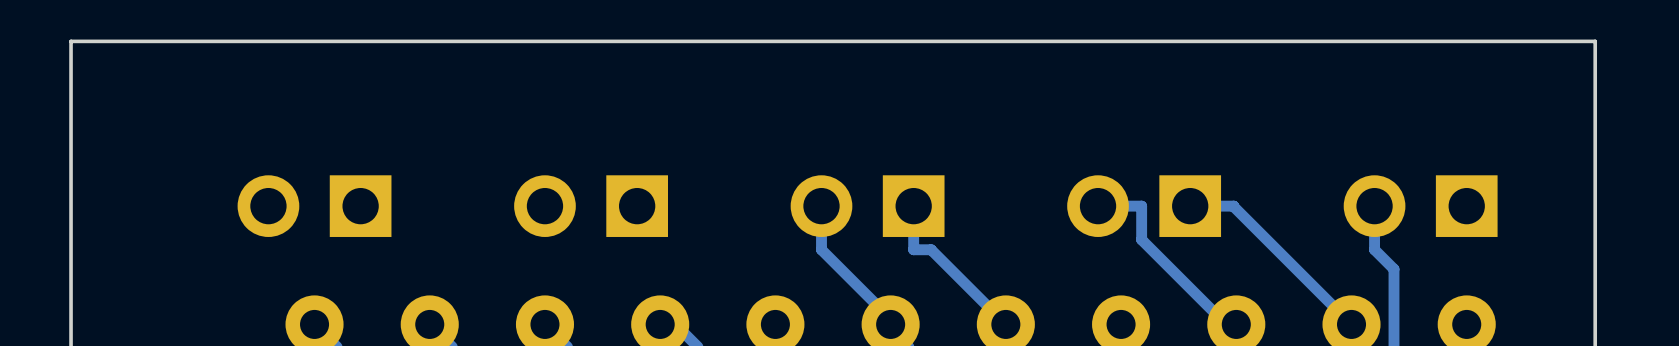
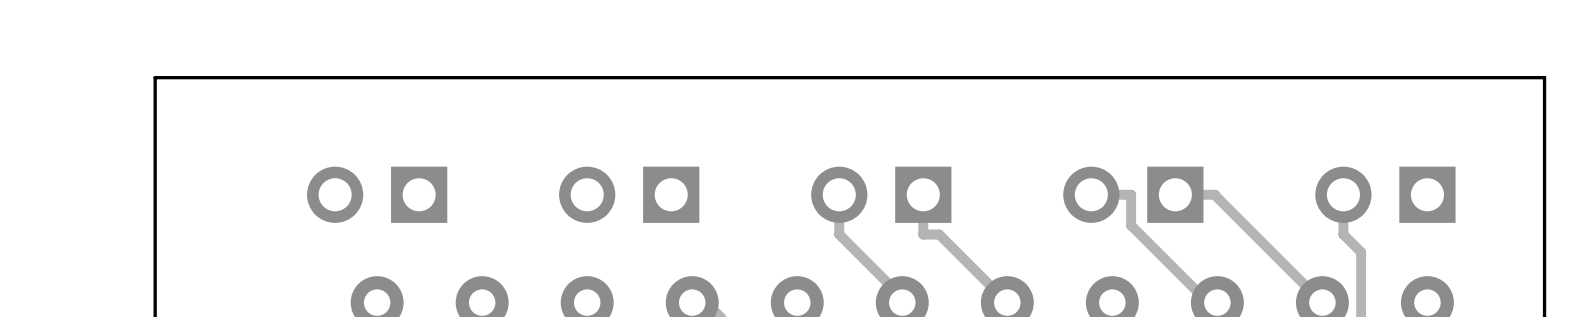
board edge: (1595, 77) (1595, 41) (71, 41) (71, 77) -> (1544, 77) (155, 77)

